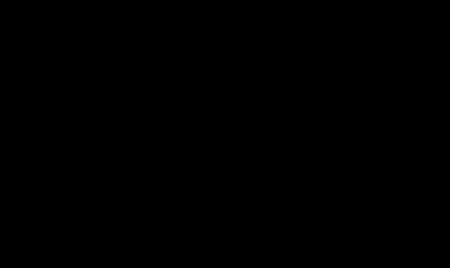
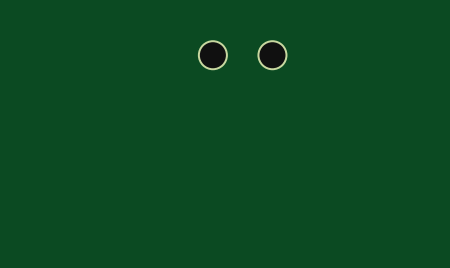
part: none -> (242, 55)

